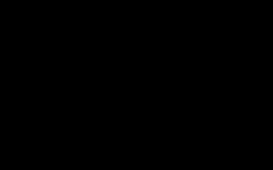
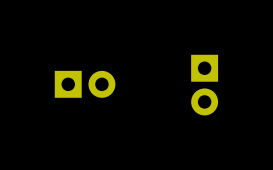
part: none -> (85, 84)
part: none -> (204, 85)

